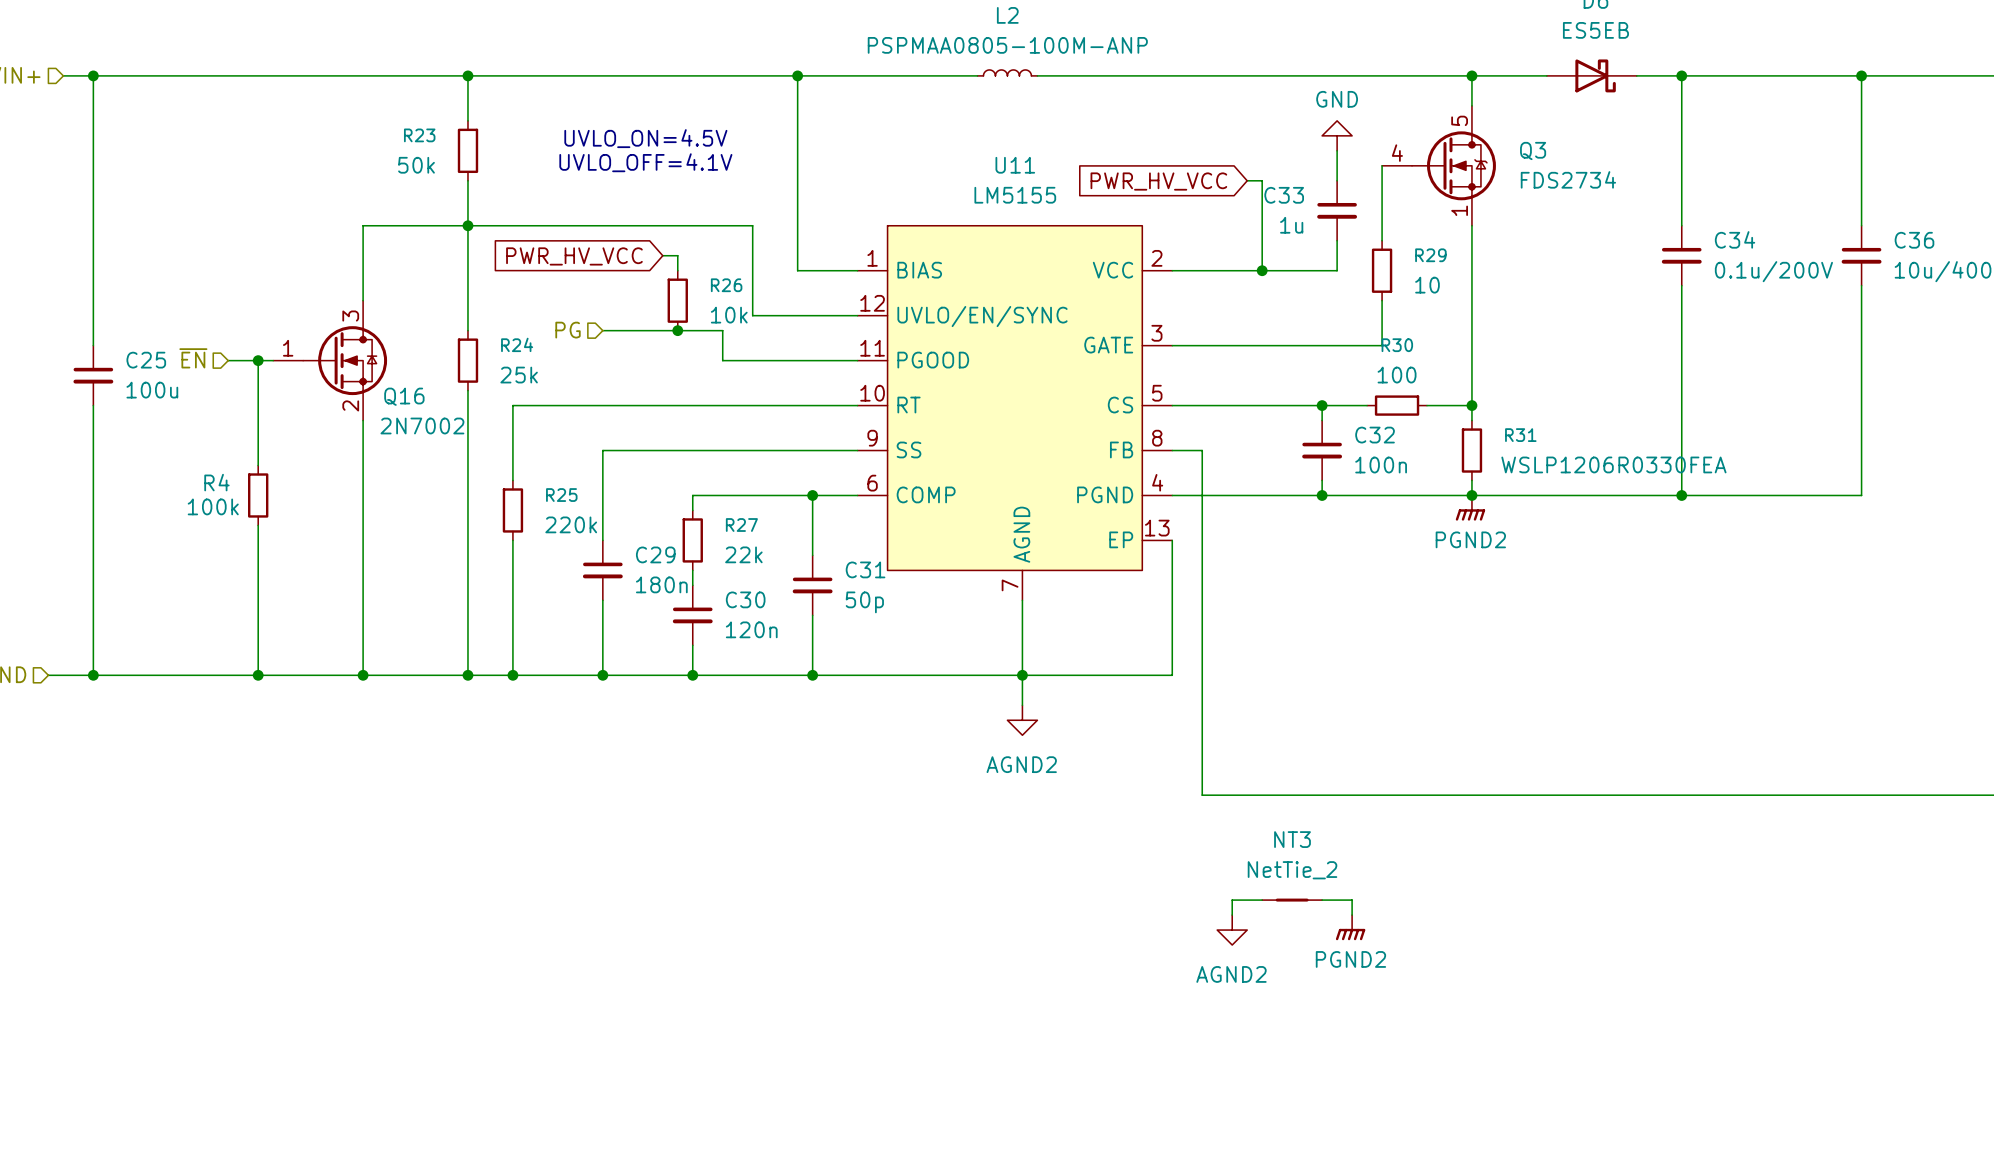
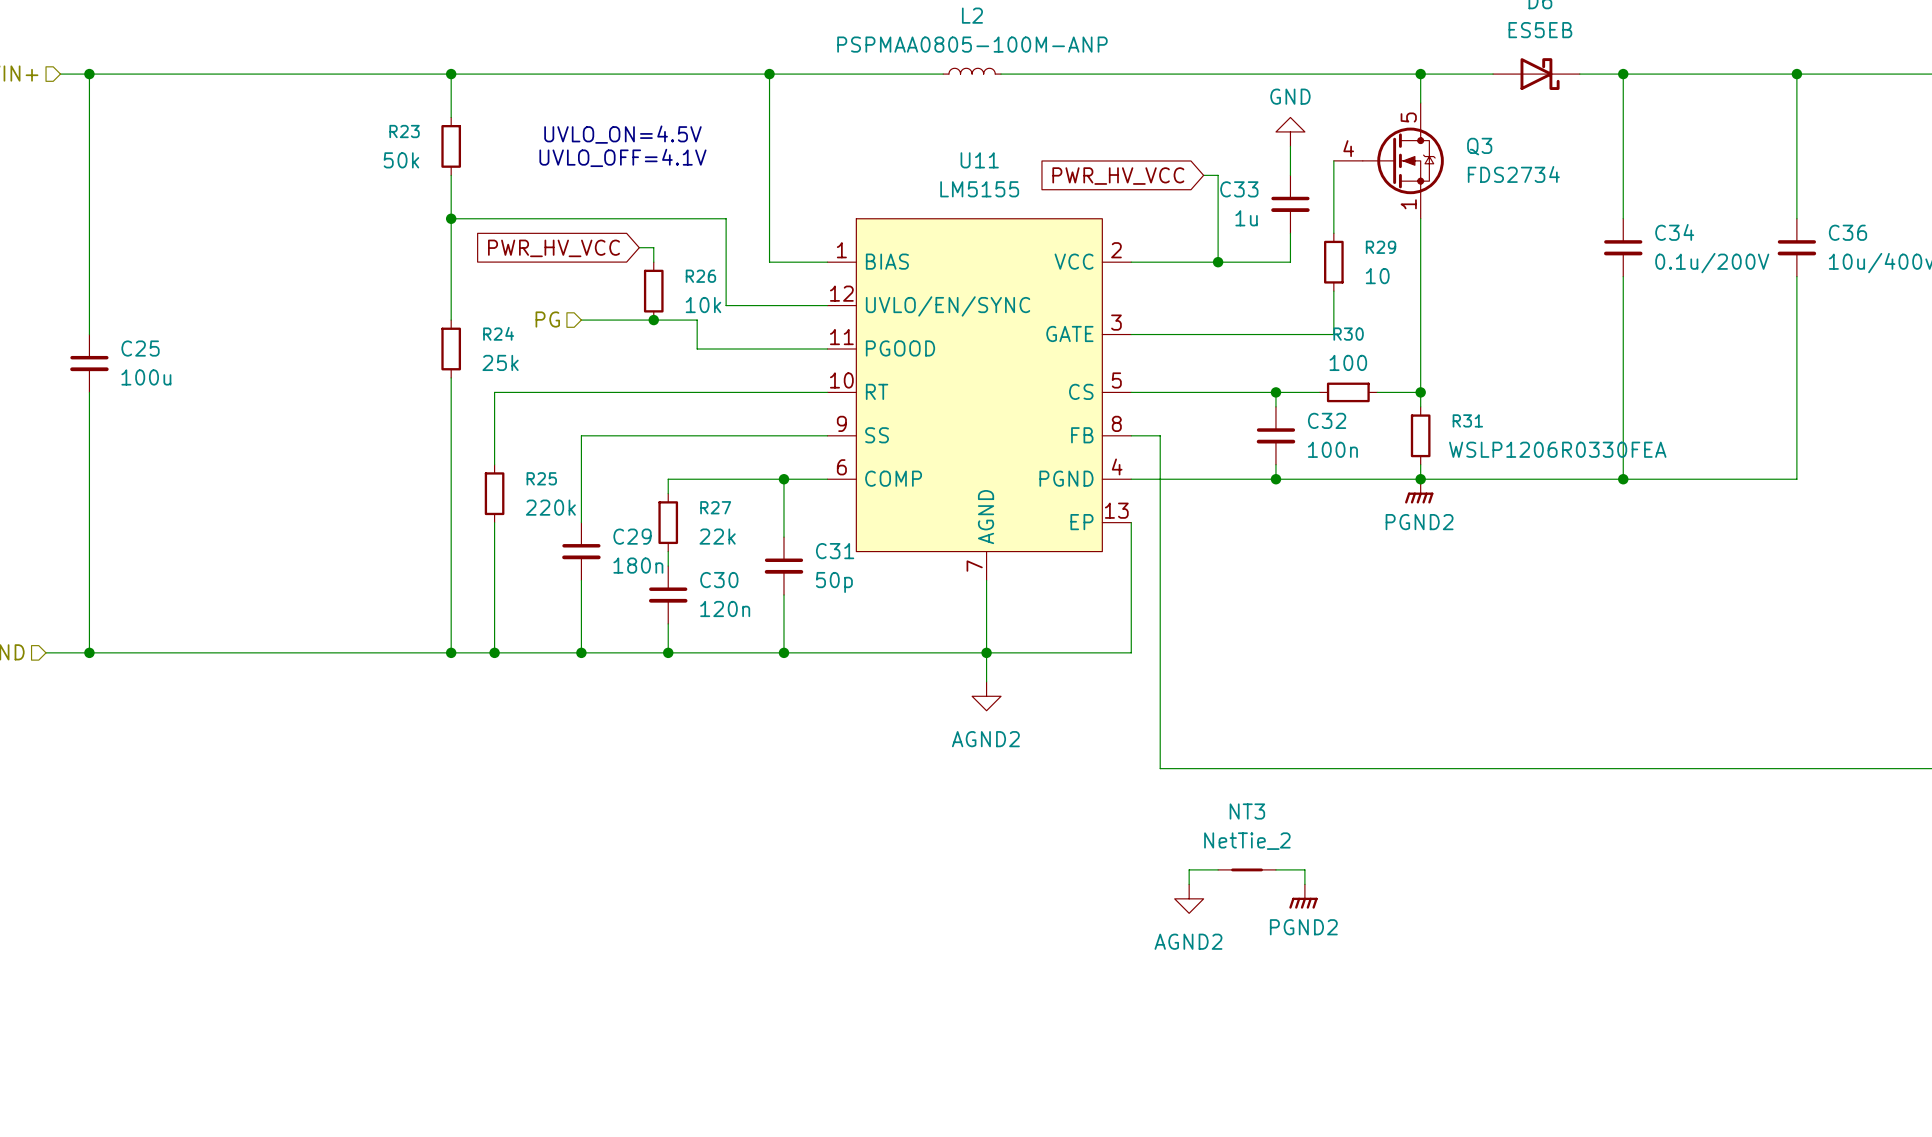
wire: (467, 225) (363, 225) (363, 300) -> none
hierarchical label: ~{EN} (193, 358) -> none
wire: (228, 360) (273, 360) -> none
wire: (258, 360) (258, 465) -> none
junction: (258, 360) -> none
Q16: 2N7002 (330, 360) -> none
wire: (363, 420) (363, 675) -> none
R4: 100k (258, 495) -> none
wire: (258, 525) (258, 675) -> none
junction: (258, 675) -> none
junction: (363, 675) -> none

